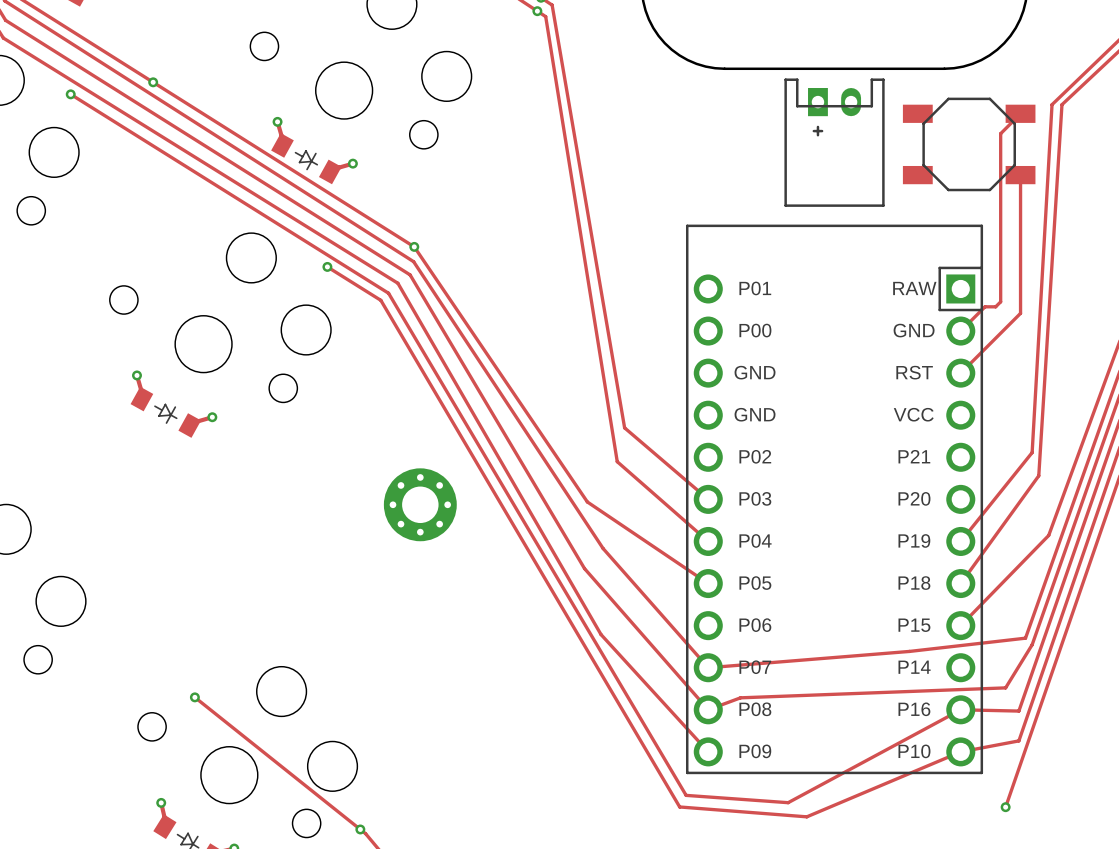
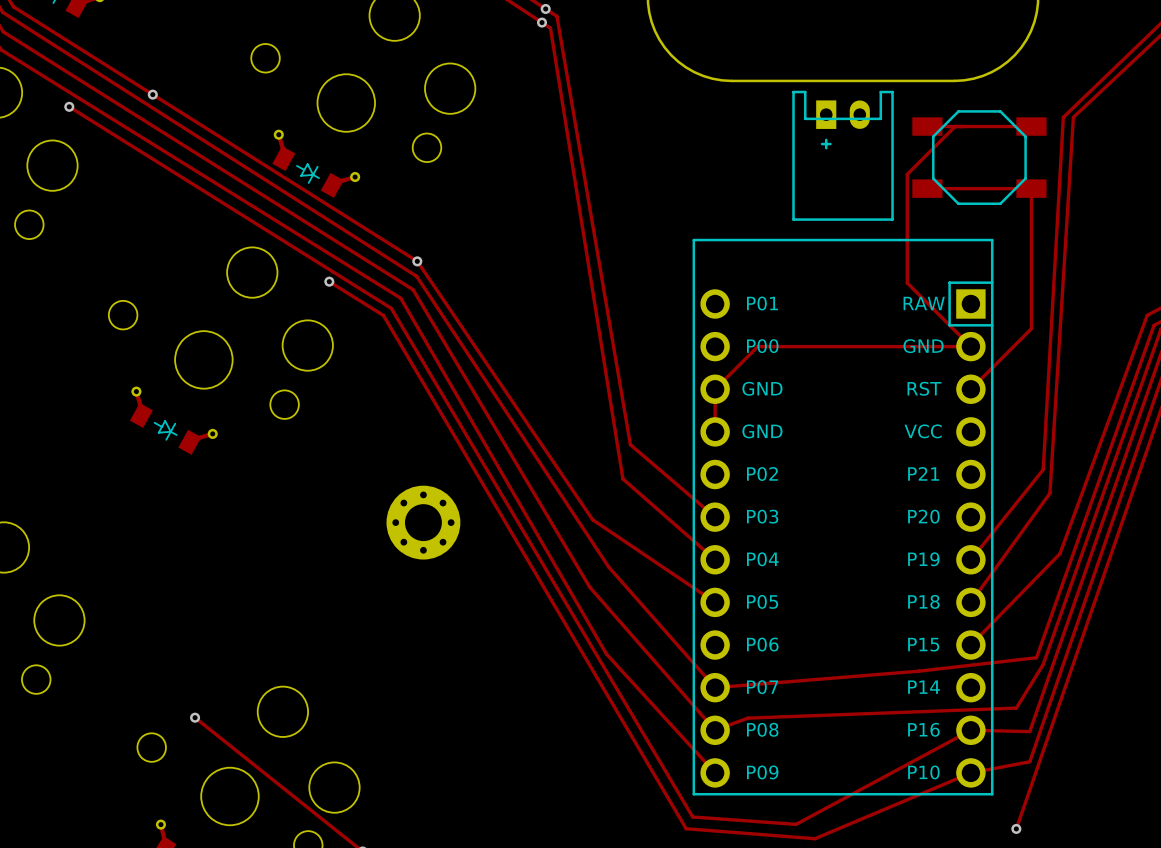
track: none -> (955, 126) (907, 174) (907, 282) (970, 346) (757, 346) (715, 389) (715, 431)
track: (1020, 113) (1000, 133) (1000, 301) (995, 306) (985, 306) (960, 331) -> (1031, 126) (927, 126)
track: none -> (927, 188) (1031, 188)

